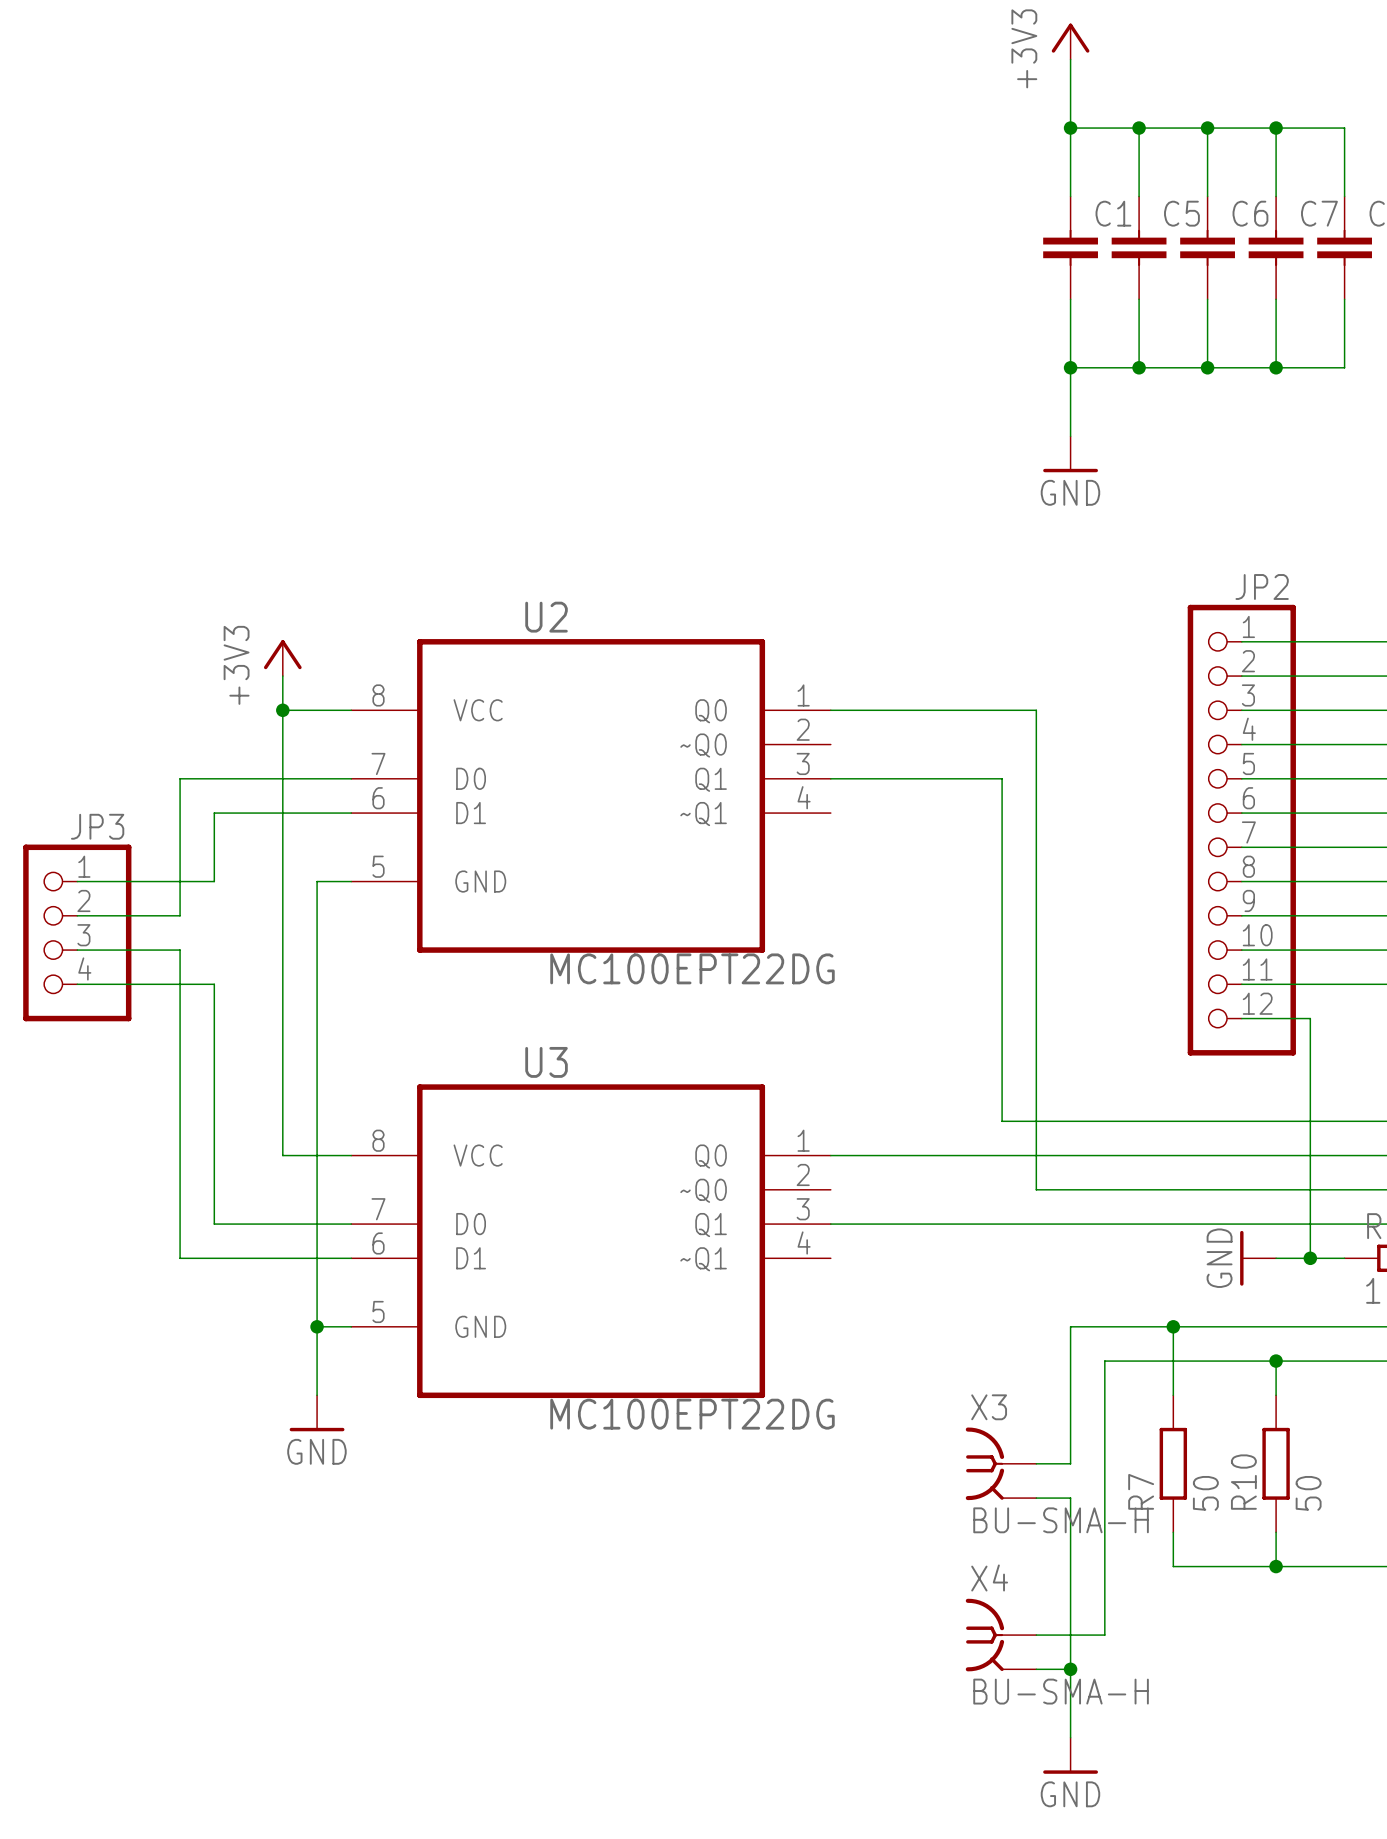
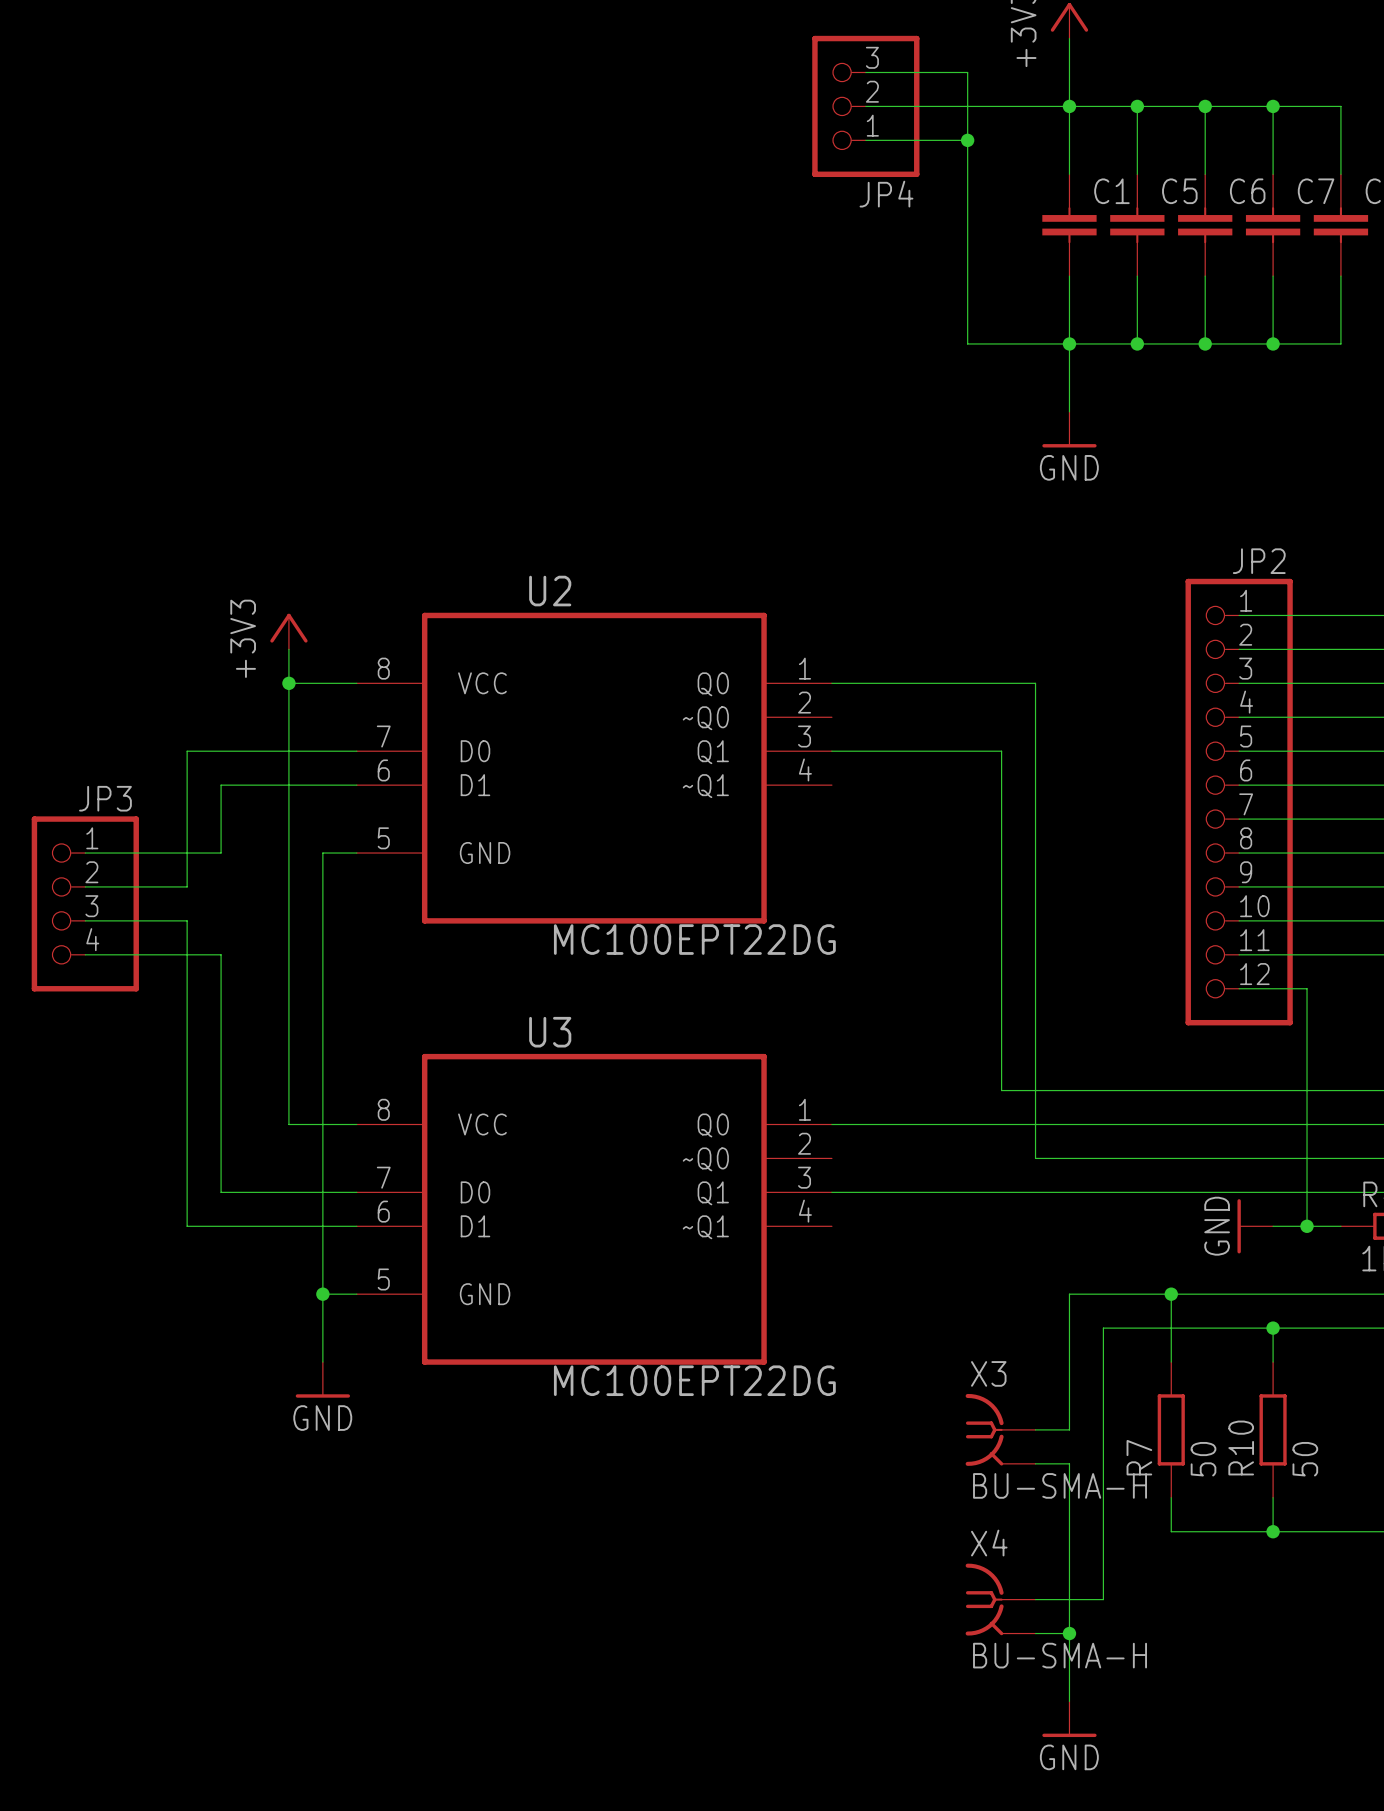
wire: none -> (865, 72) (967, 72) (967, 343) (1069, 343)
wire: none -> (865, 106) (1069, 106)
JP4: none -> (865, 106)
wire: none -> (865, 140) (967, 140)
junction: none -> (967, 140)

